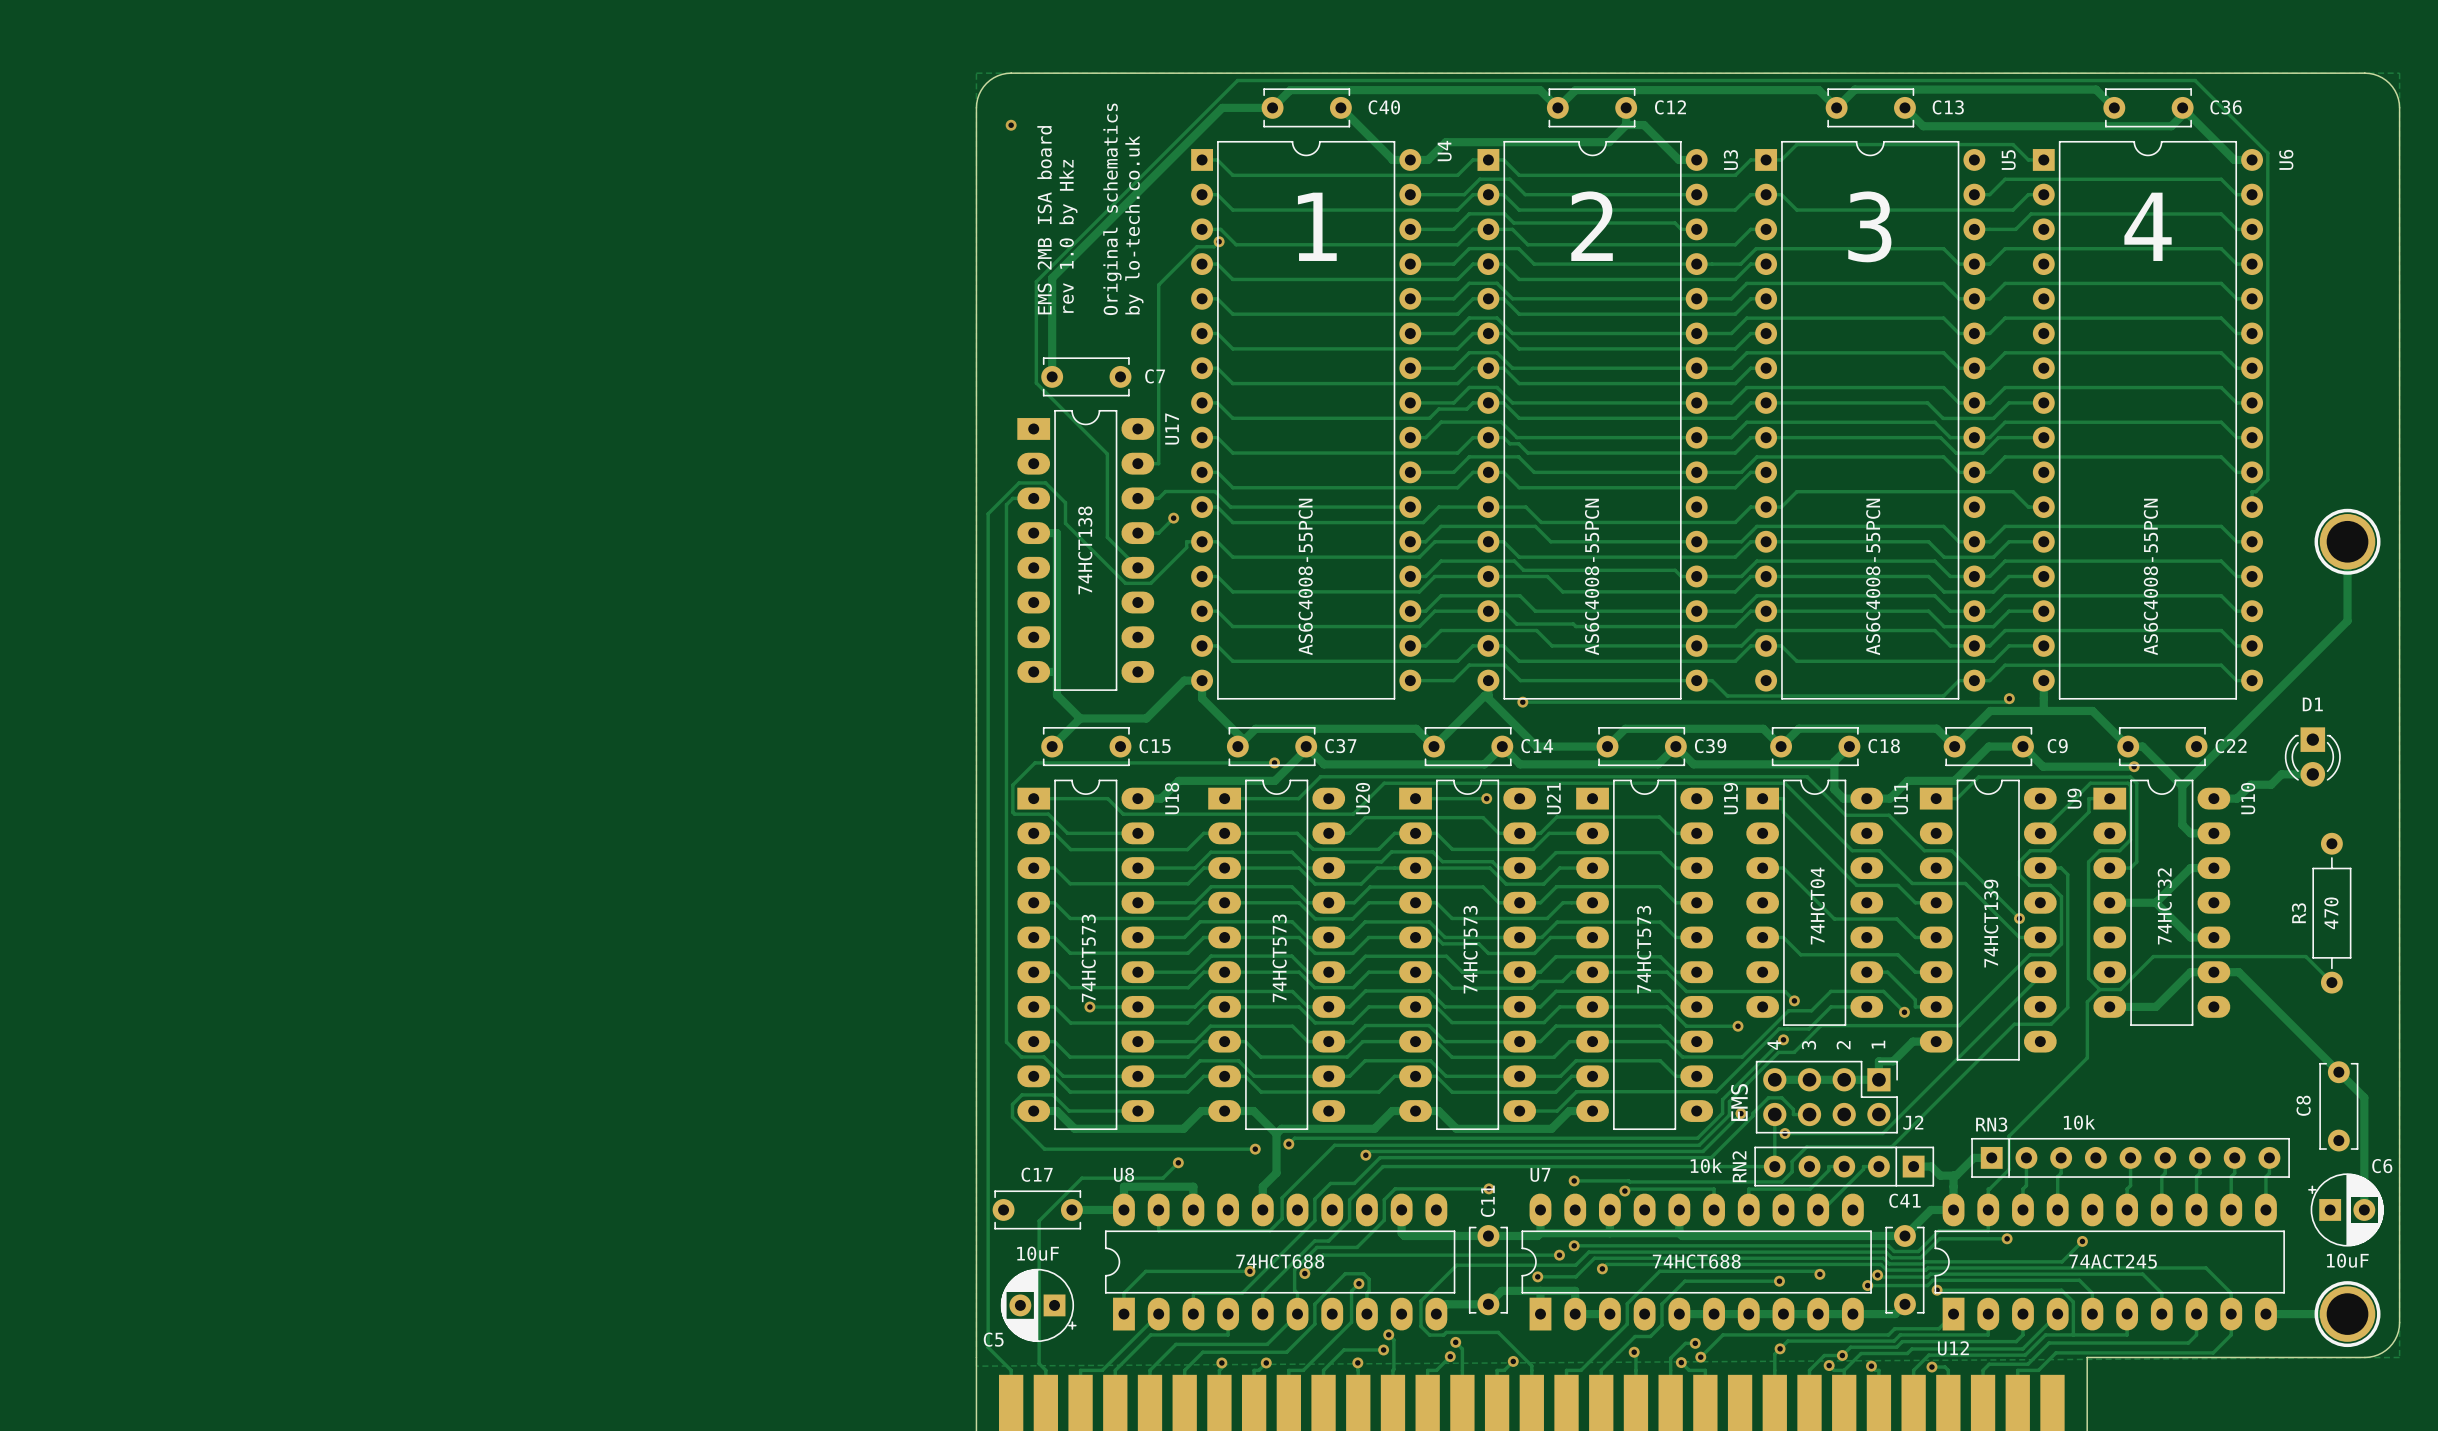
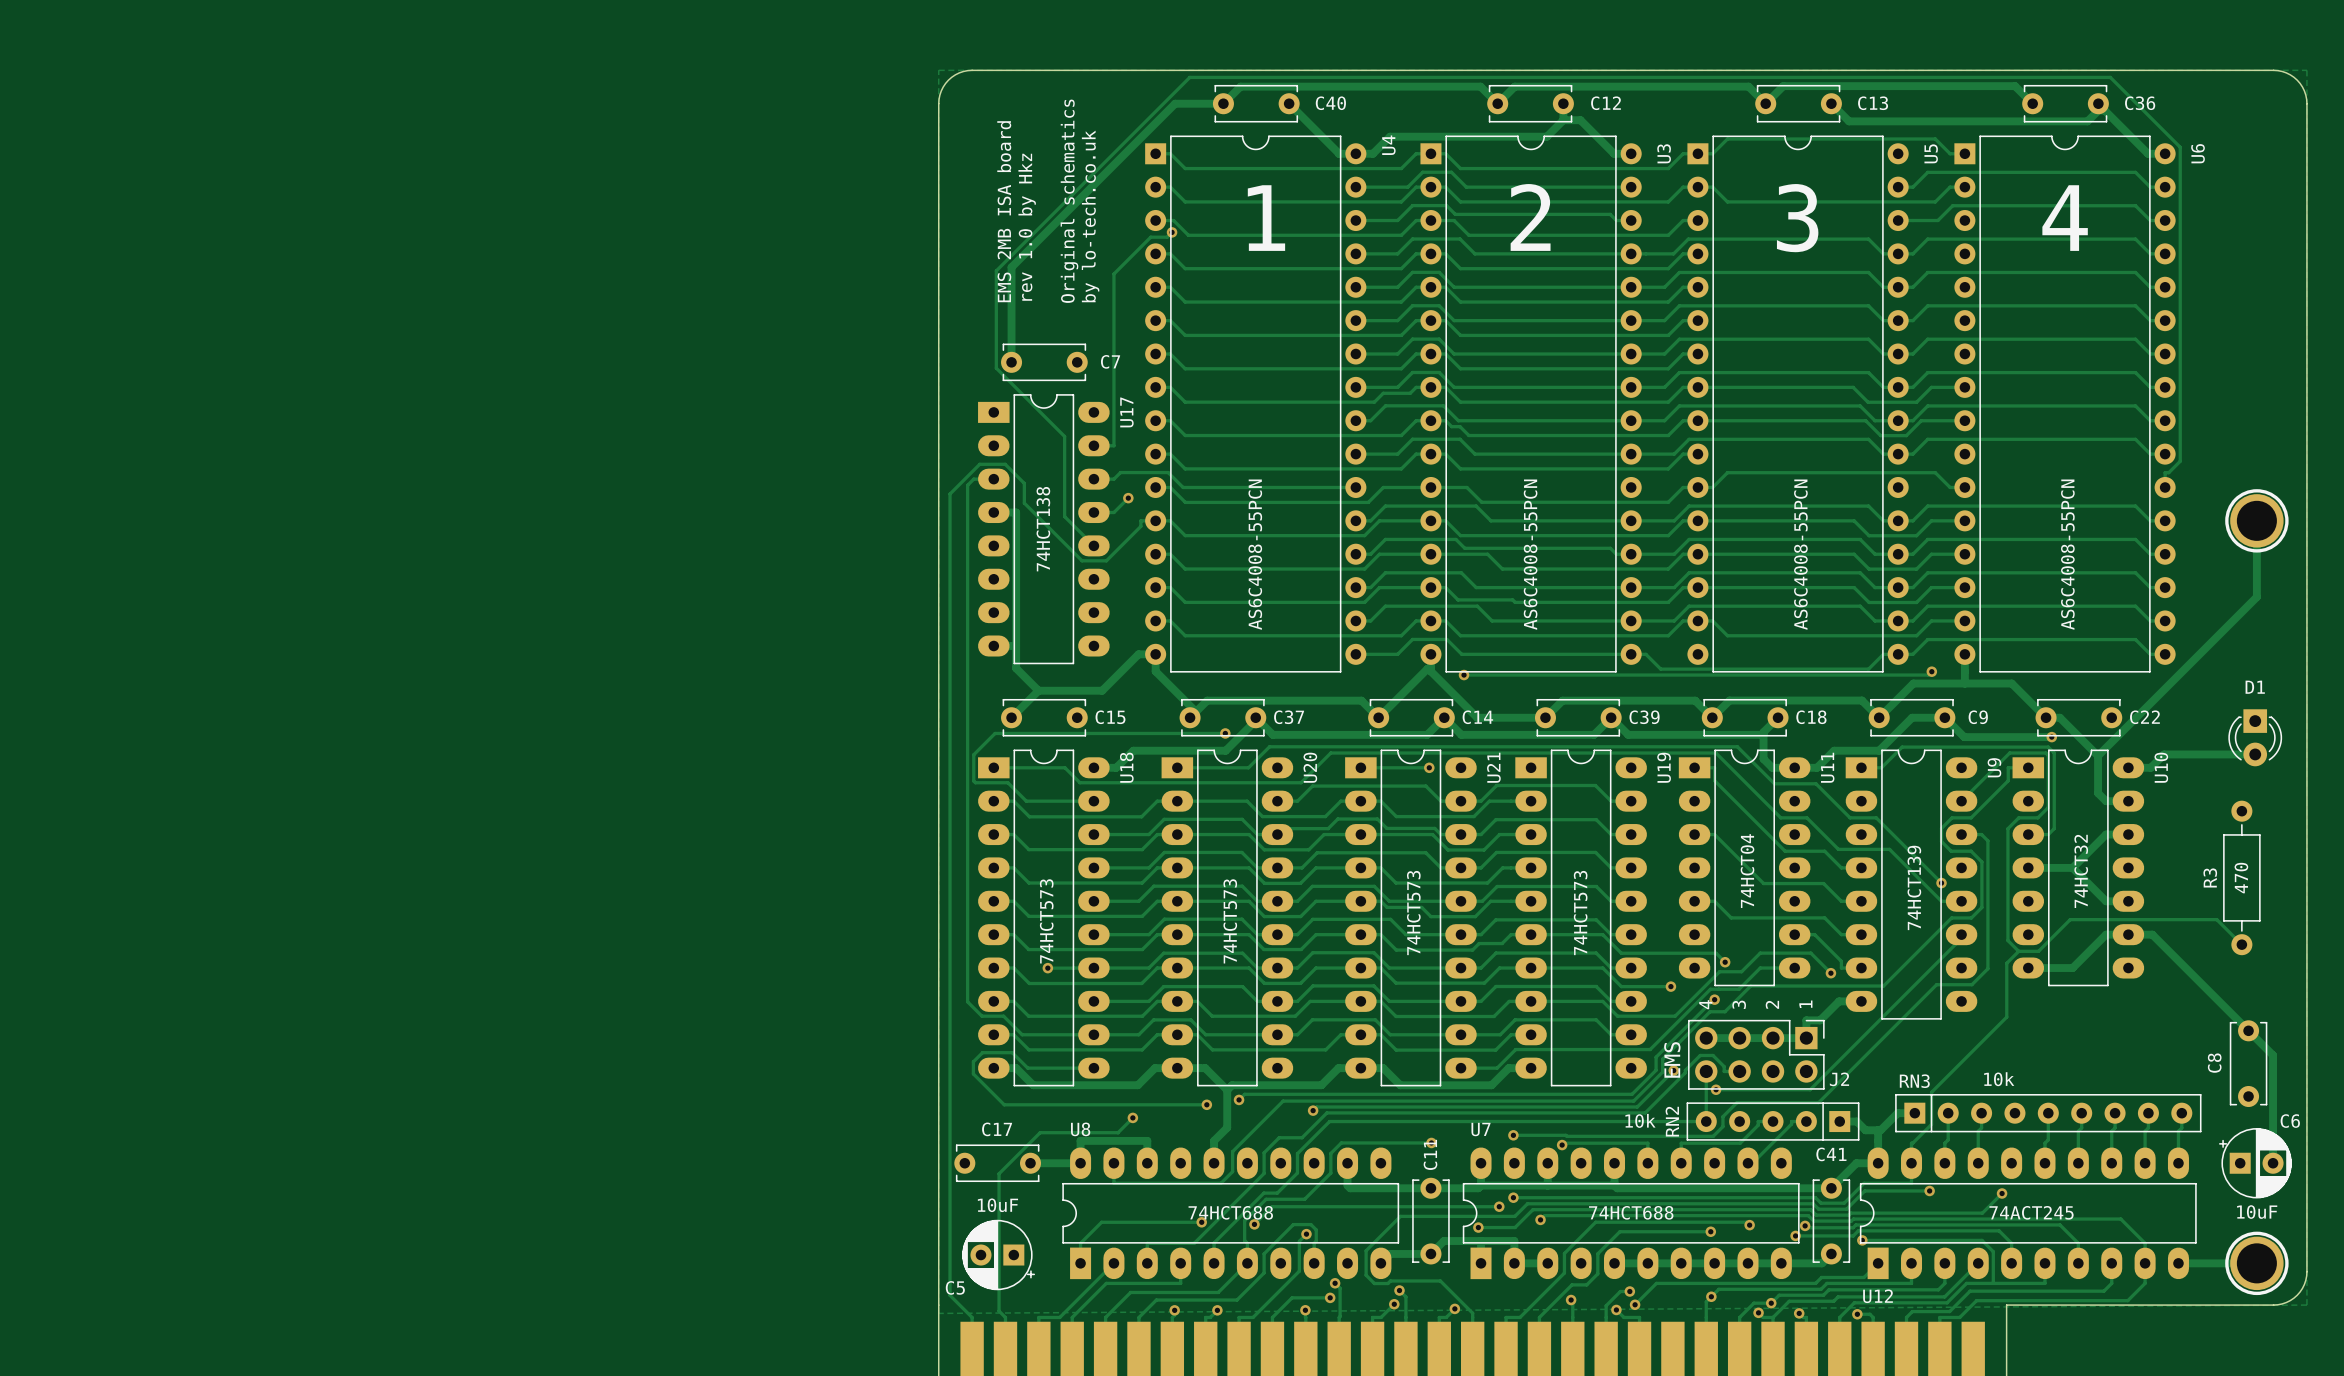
via: (1011, 125) -> none
D1 footprint: [2284, 727, 2341, 787] -> [2228, 709, 2283, 767]
track: (2312, 774) (2281, 774) (2271, 784) -> (2255, 754) (2183, 754)

